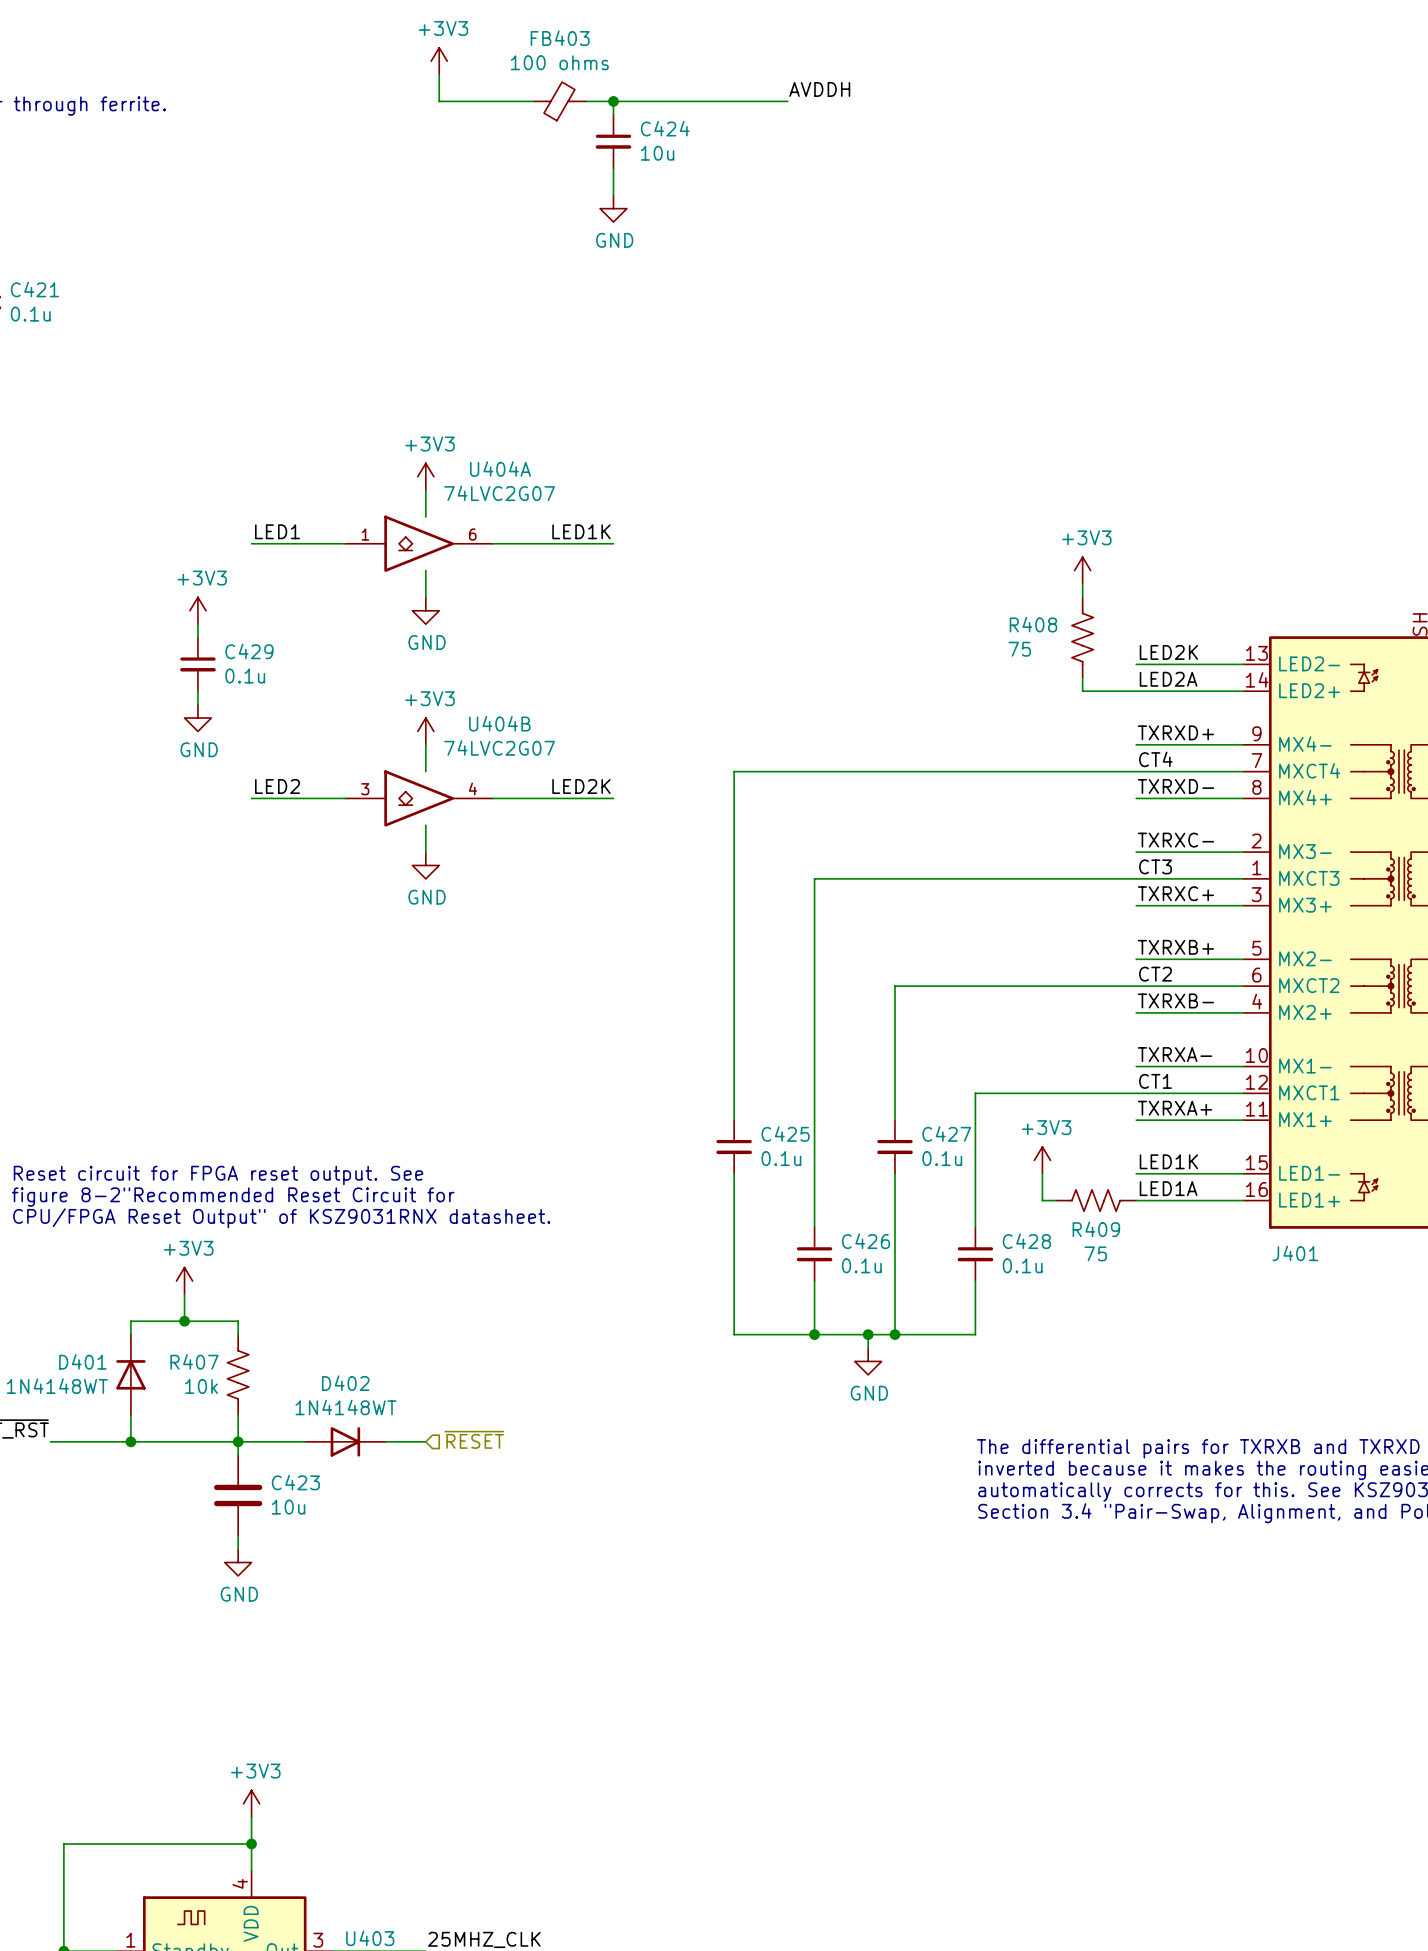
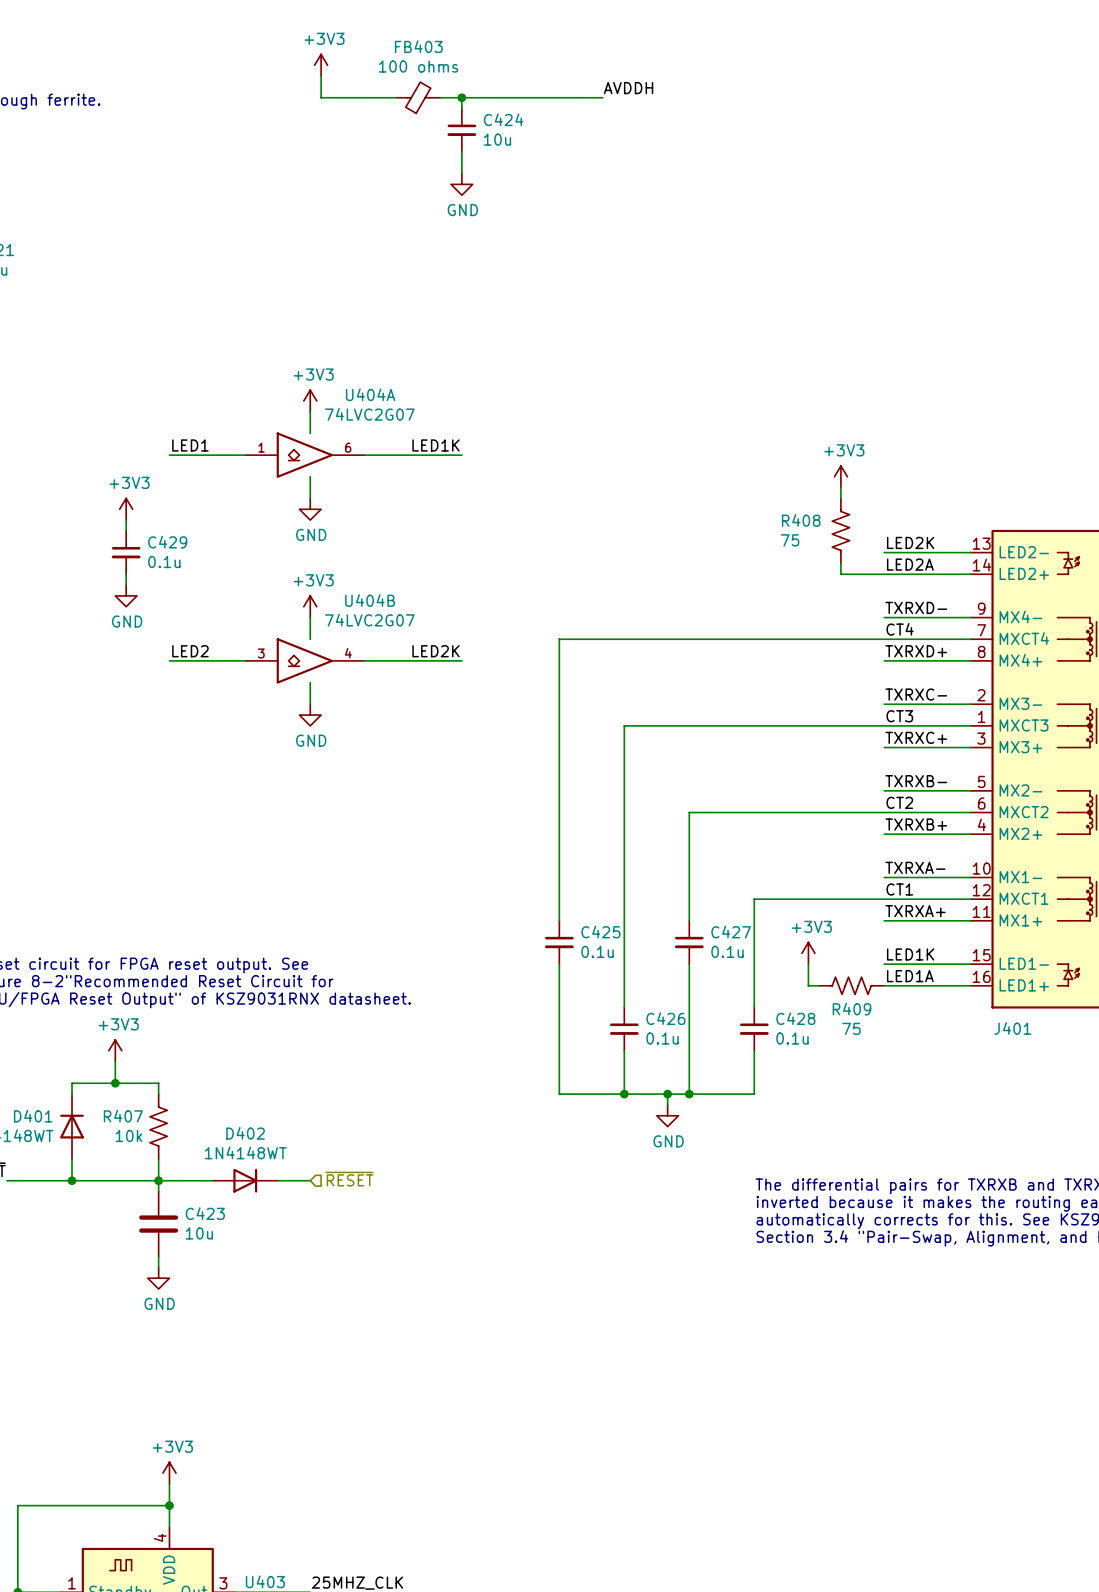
label: TXRXD+ (1175, 732) -> TXRXD- (916, 607)
label: TXRXD- (1175, 786) -> TXRXD+ (916, 651)
label: TXRXB+ (1175, 947) -> TXRXB- (916, 781)
label: TXRXB- (1175, 1000) -> TXRXB+ (916, 824)

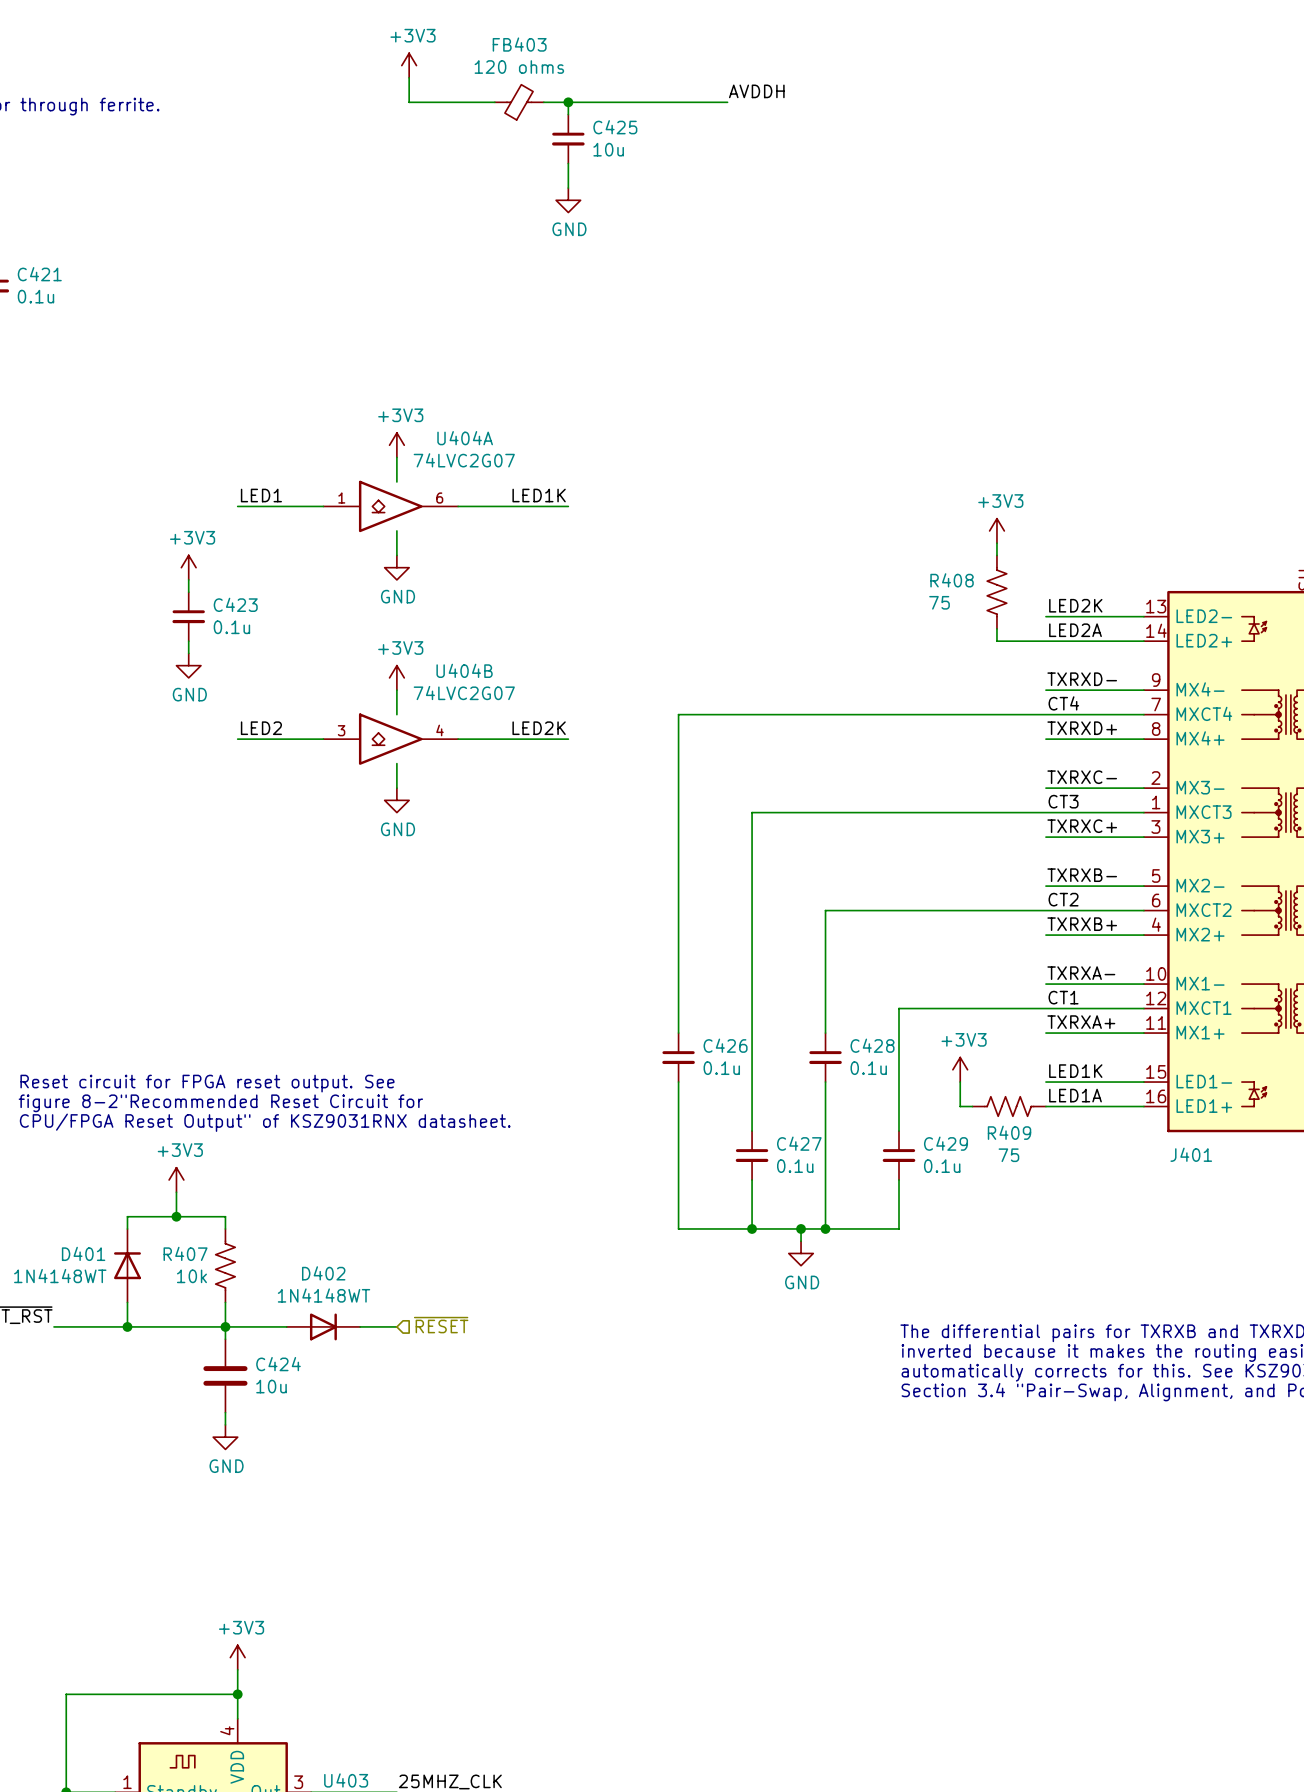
FB403 value: 100 ohms (418, 66) -> 120 ohms (519, 67)
C424 name: C424 (503, 119) -> C425 (615, 127)
C429 name: C429 (167, 542) -> C423 (235, 604)
C425 name: C425 (600, 932) -> C426 (725, 1045)
C427 name: C427 (731, 932) -> C428 (872, 1045)
C426 name: C426 (665, 1018) -> C427 (799, 1143)
C428 name: C428 (795, 1018) -> C429 (946, 1143)
C423 name: C423 (205, 1213) -> C424 (278, 1364)

